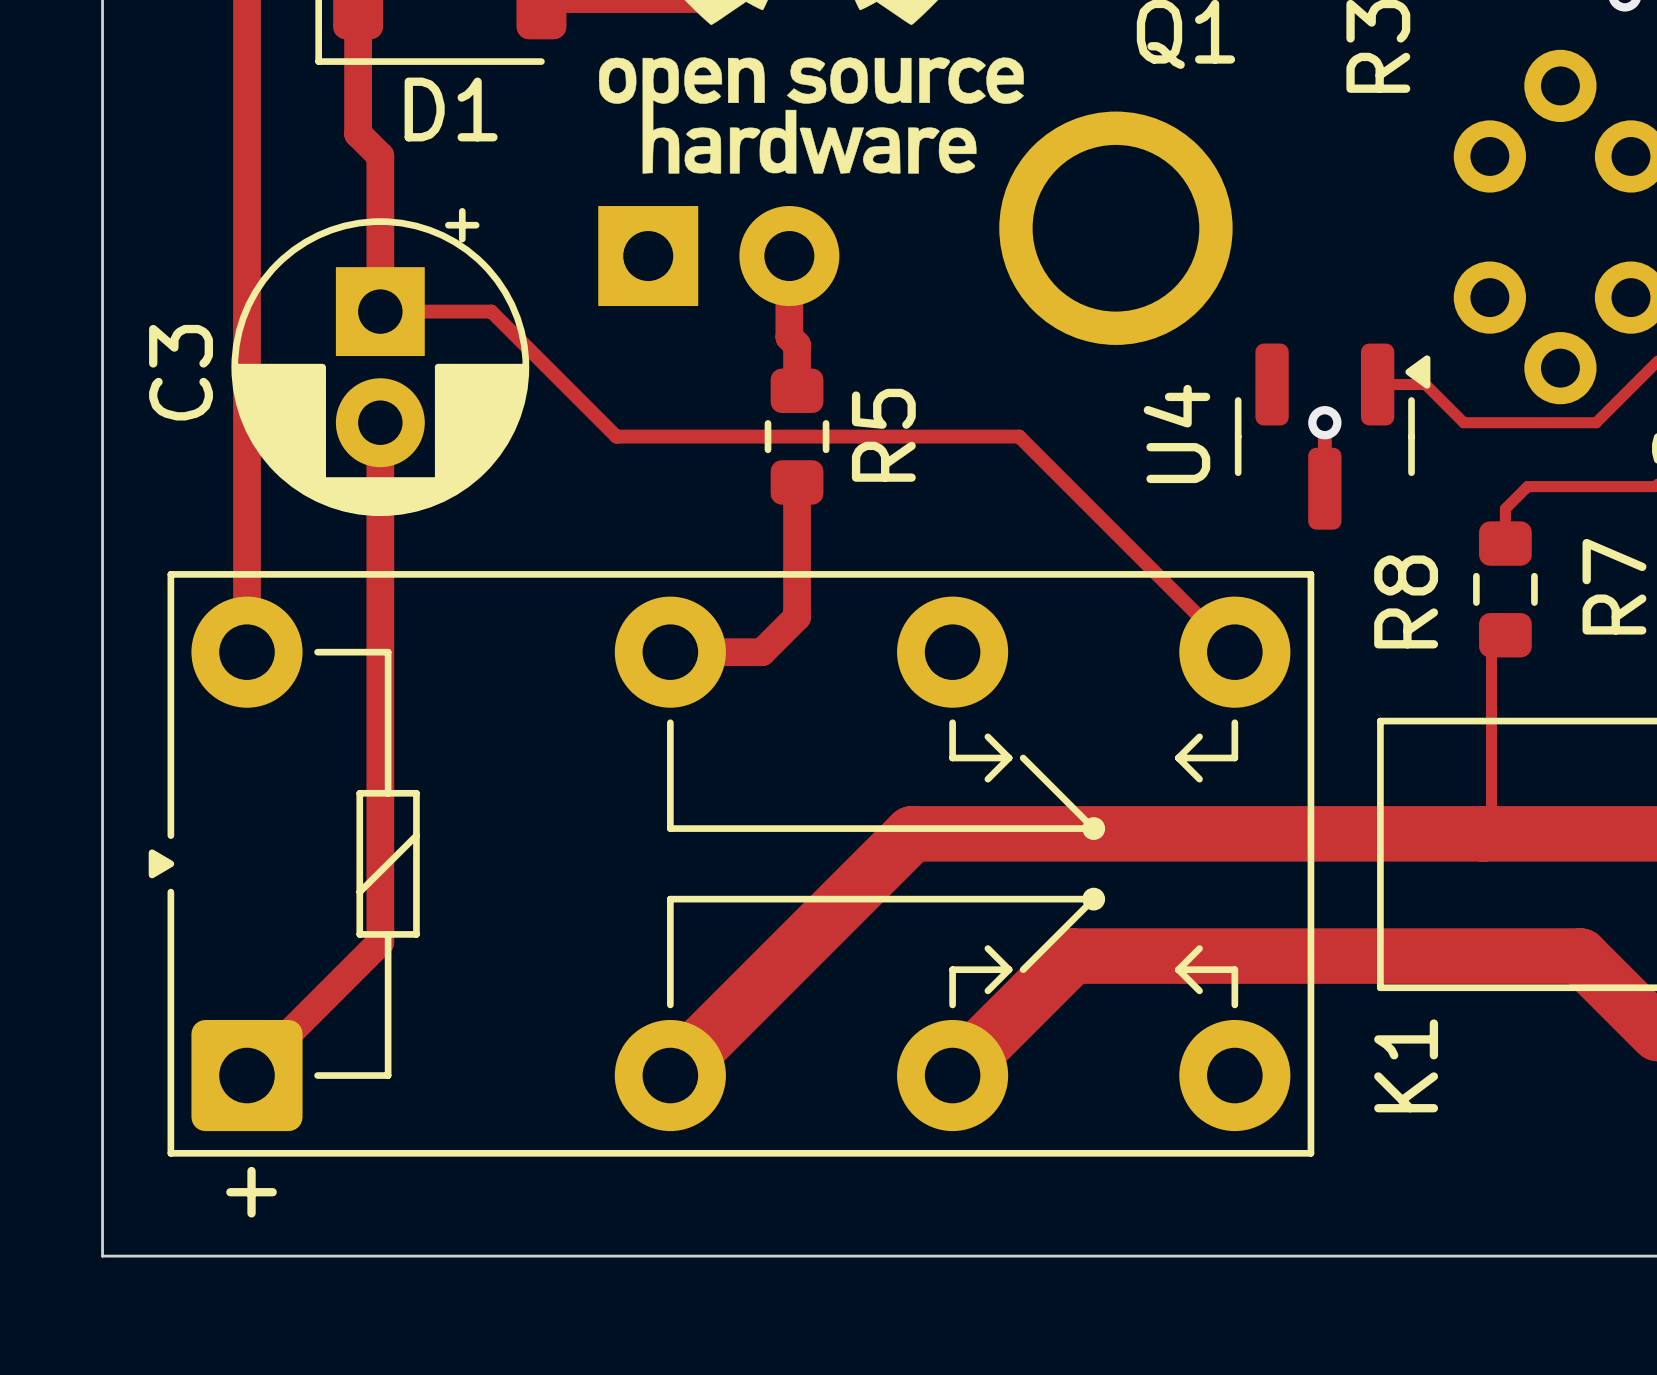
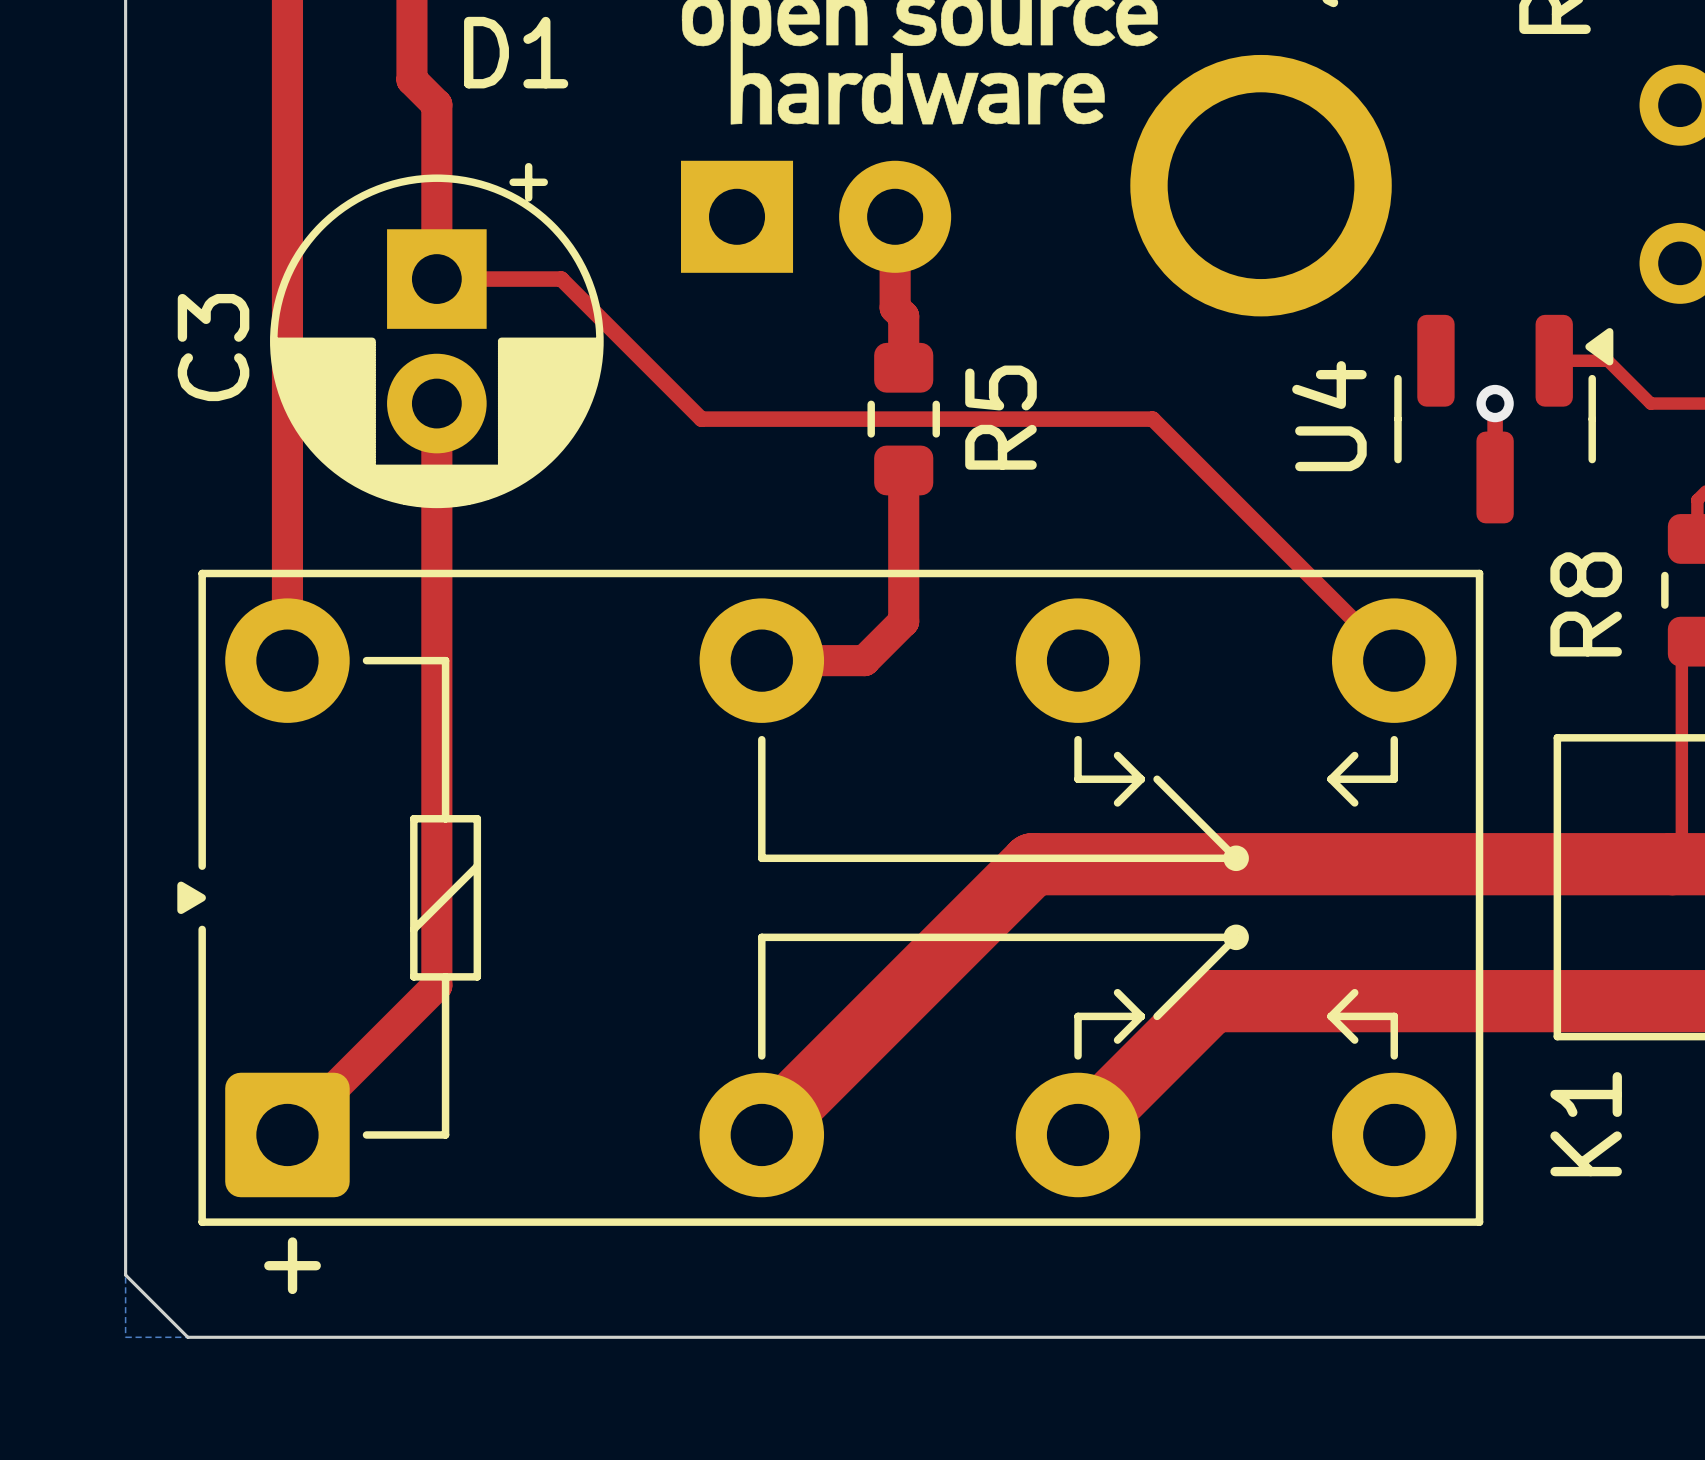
board edge: (102, 1200) (102, 1256) (158, 1256) -> (125, 1275) (187, 1337)

